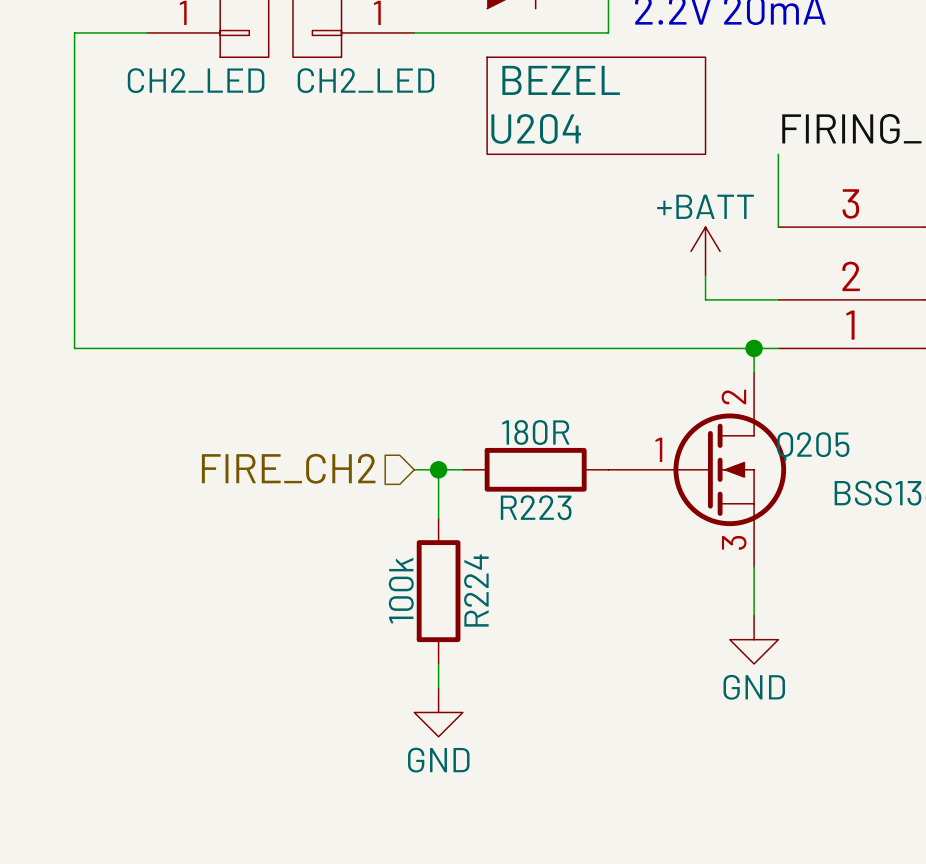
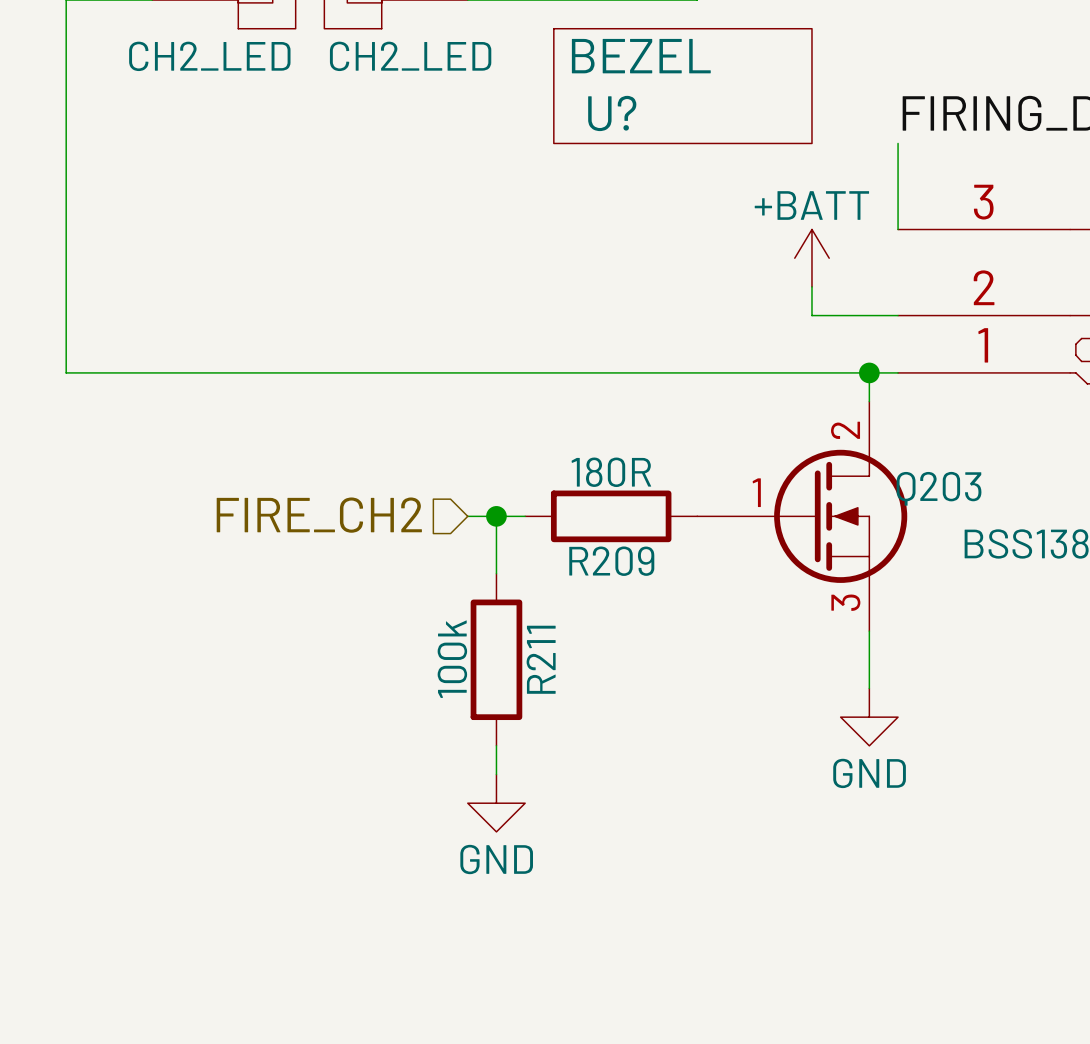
U204 name: U204 (536, 128) -> U? (612, 113)
Q205 name: Q205 (813, 446) -> Q203 (939, 488)
R223 name: R223 (536, 507) -> R209 (611, 561)
R224 name: R224 (476, 590) -> R211 (541, 659)

